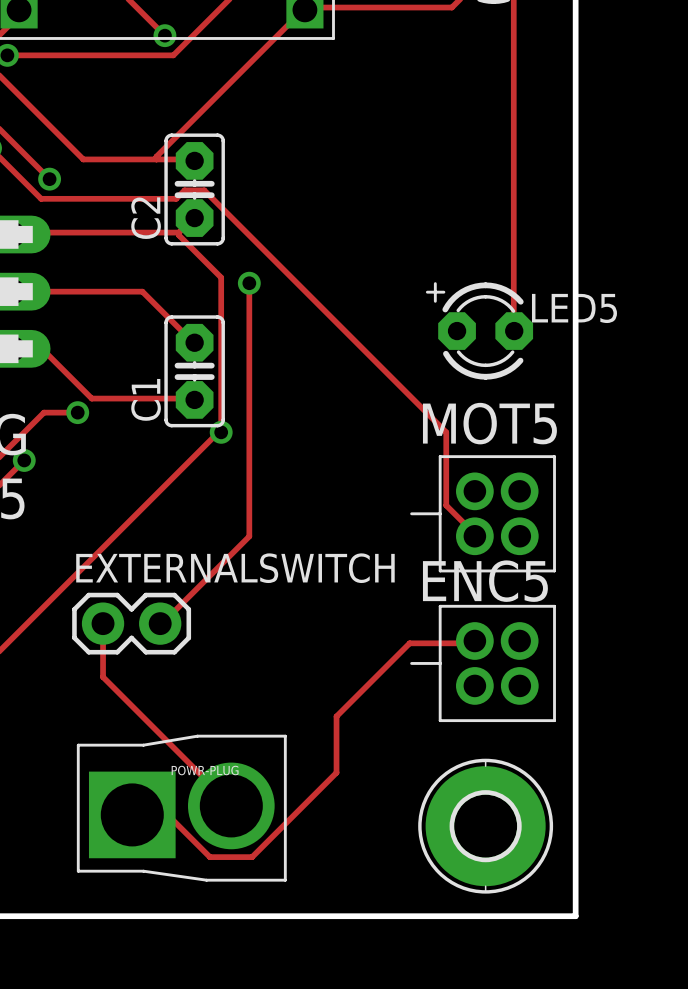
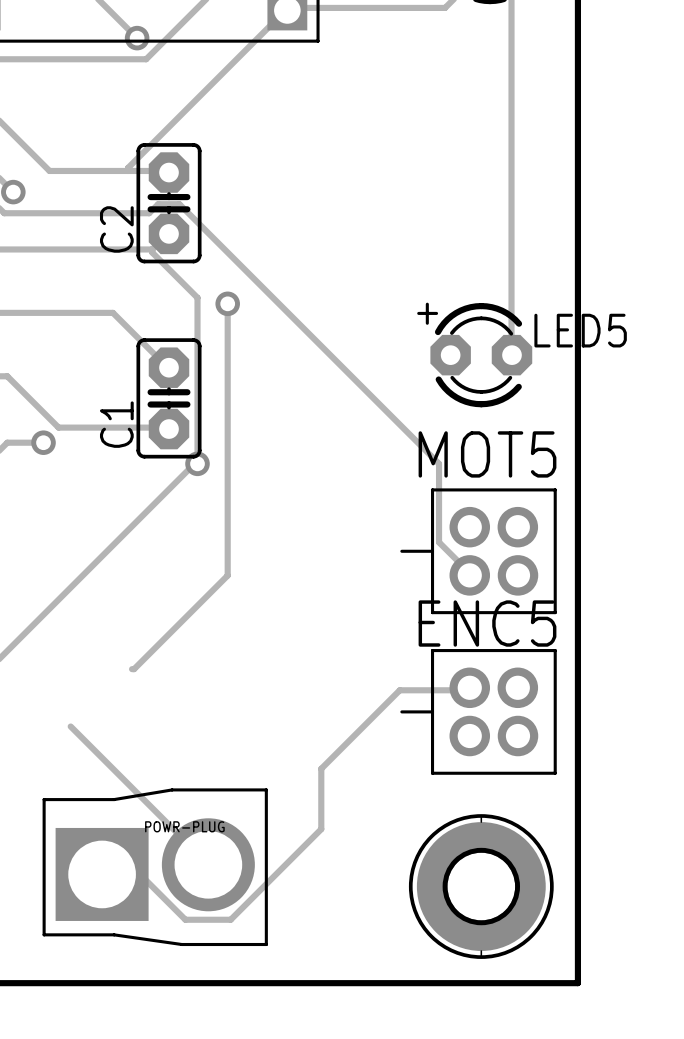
track: (103, 623) (103, 677) -> none
EXTERNALSWITCH: (131, 623) -> none

